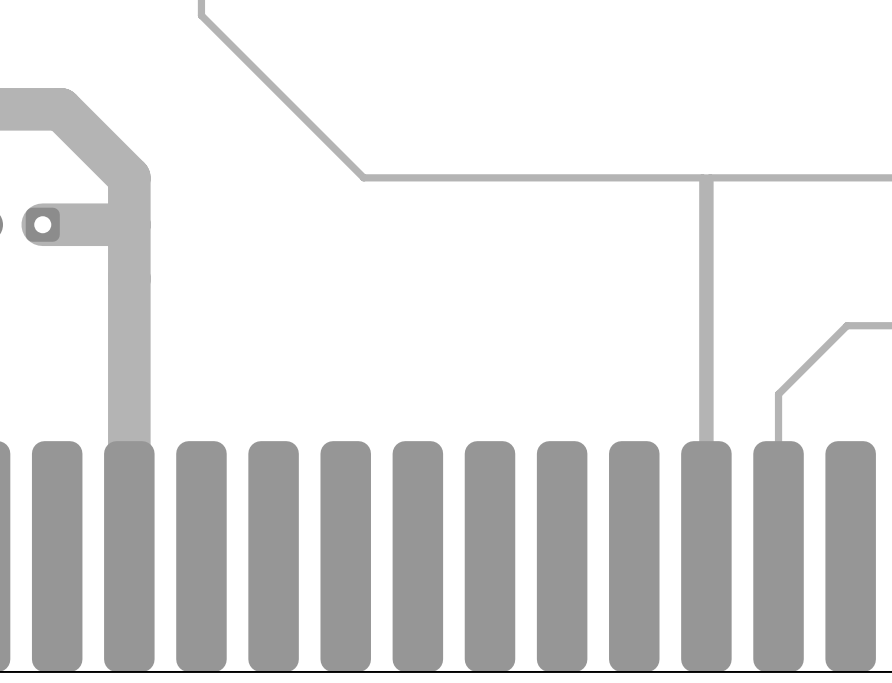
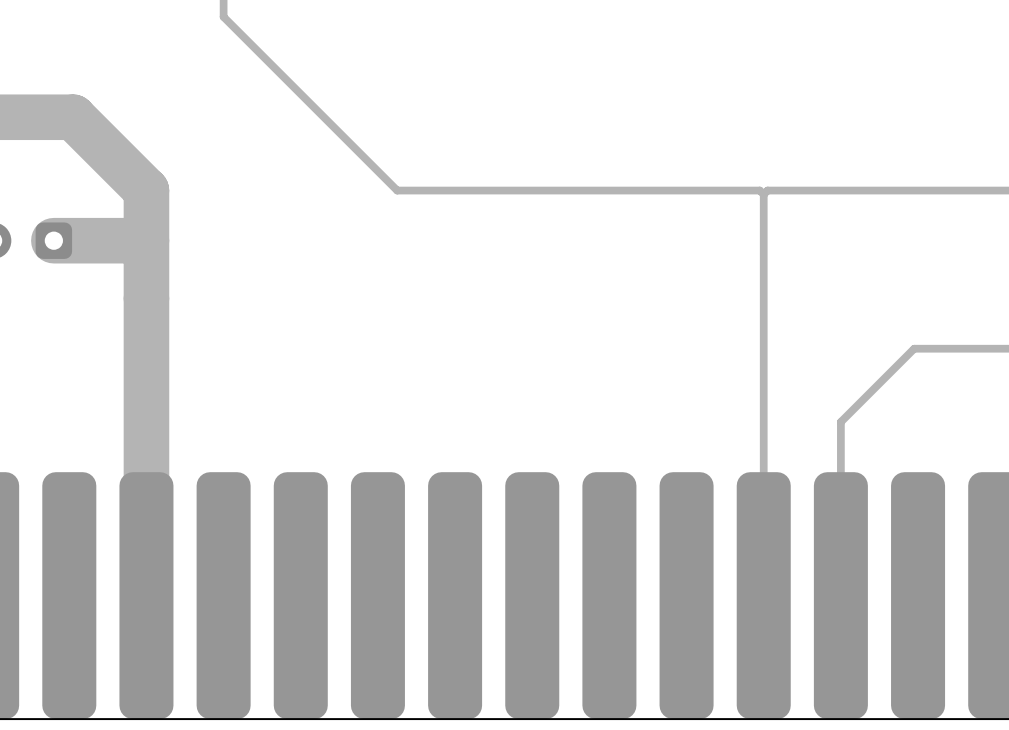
track width: thick (706, 181) (706, 556) -> thin (763, 194) (763, 595)

